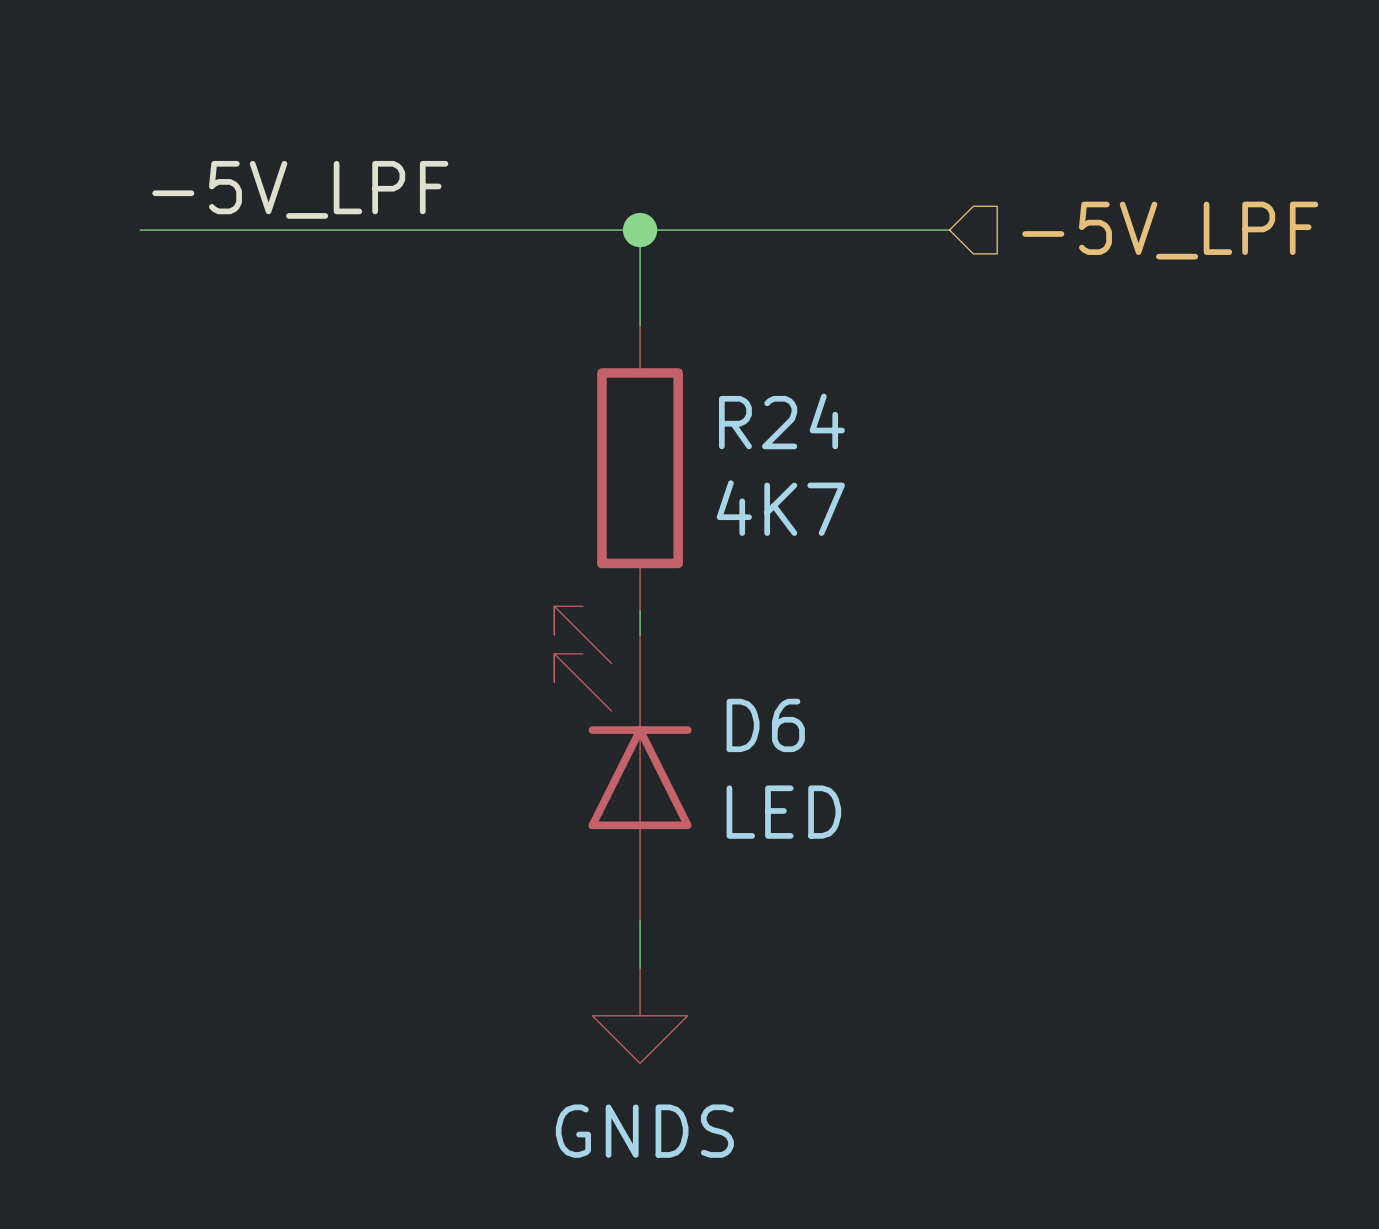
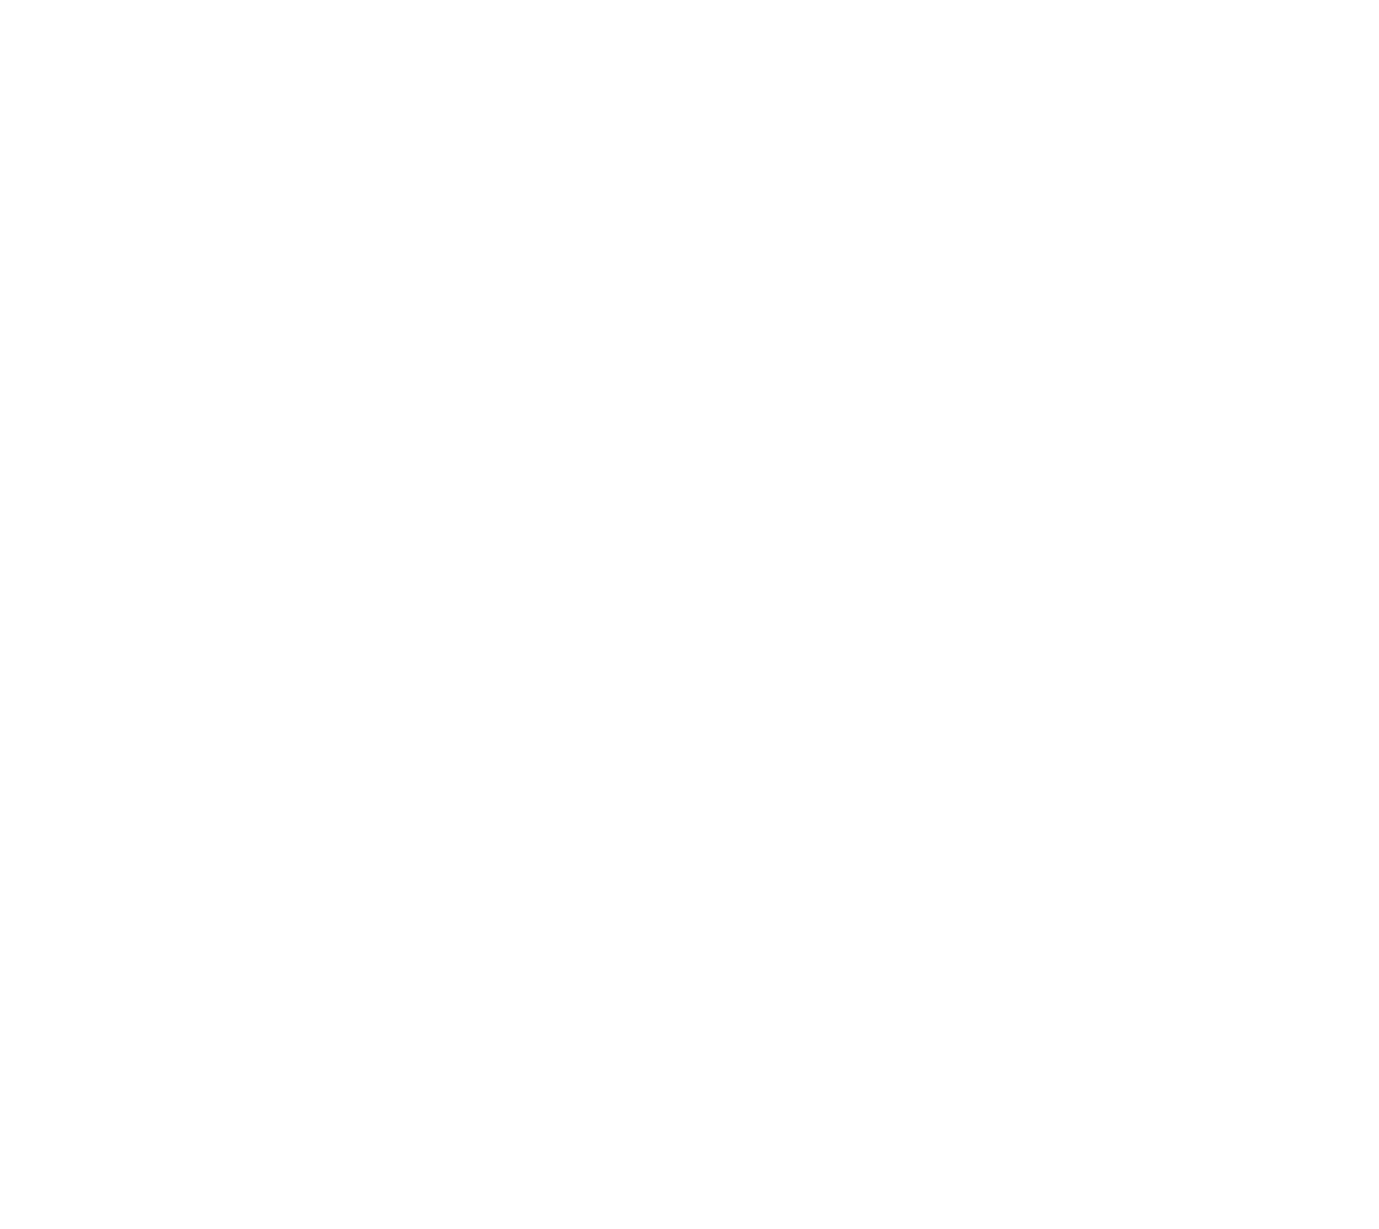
label: -5V_LPF (300, 189) -> none
wire: (140, 230) (949, 230) -> none
wire: (640, 230) (640, 325) -> none
junction: (640, 230) -> none
hierarchical label: -5V_LPF (1170, 230) -> none
R24: 4K7 (640, 468) -> none
wire: (640, 611) (640, 634) -> none
D6: LED (622, 763) -> none
wire: (640, 920) (640, 968) -> none
power symbol: GNDS (640, 1015) -> none

